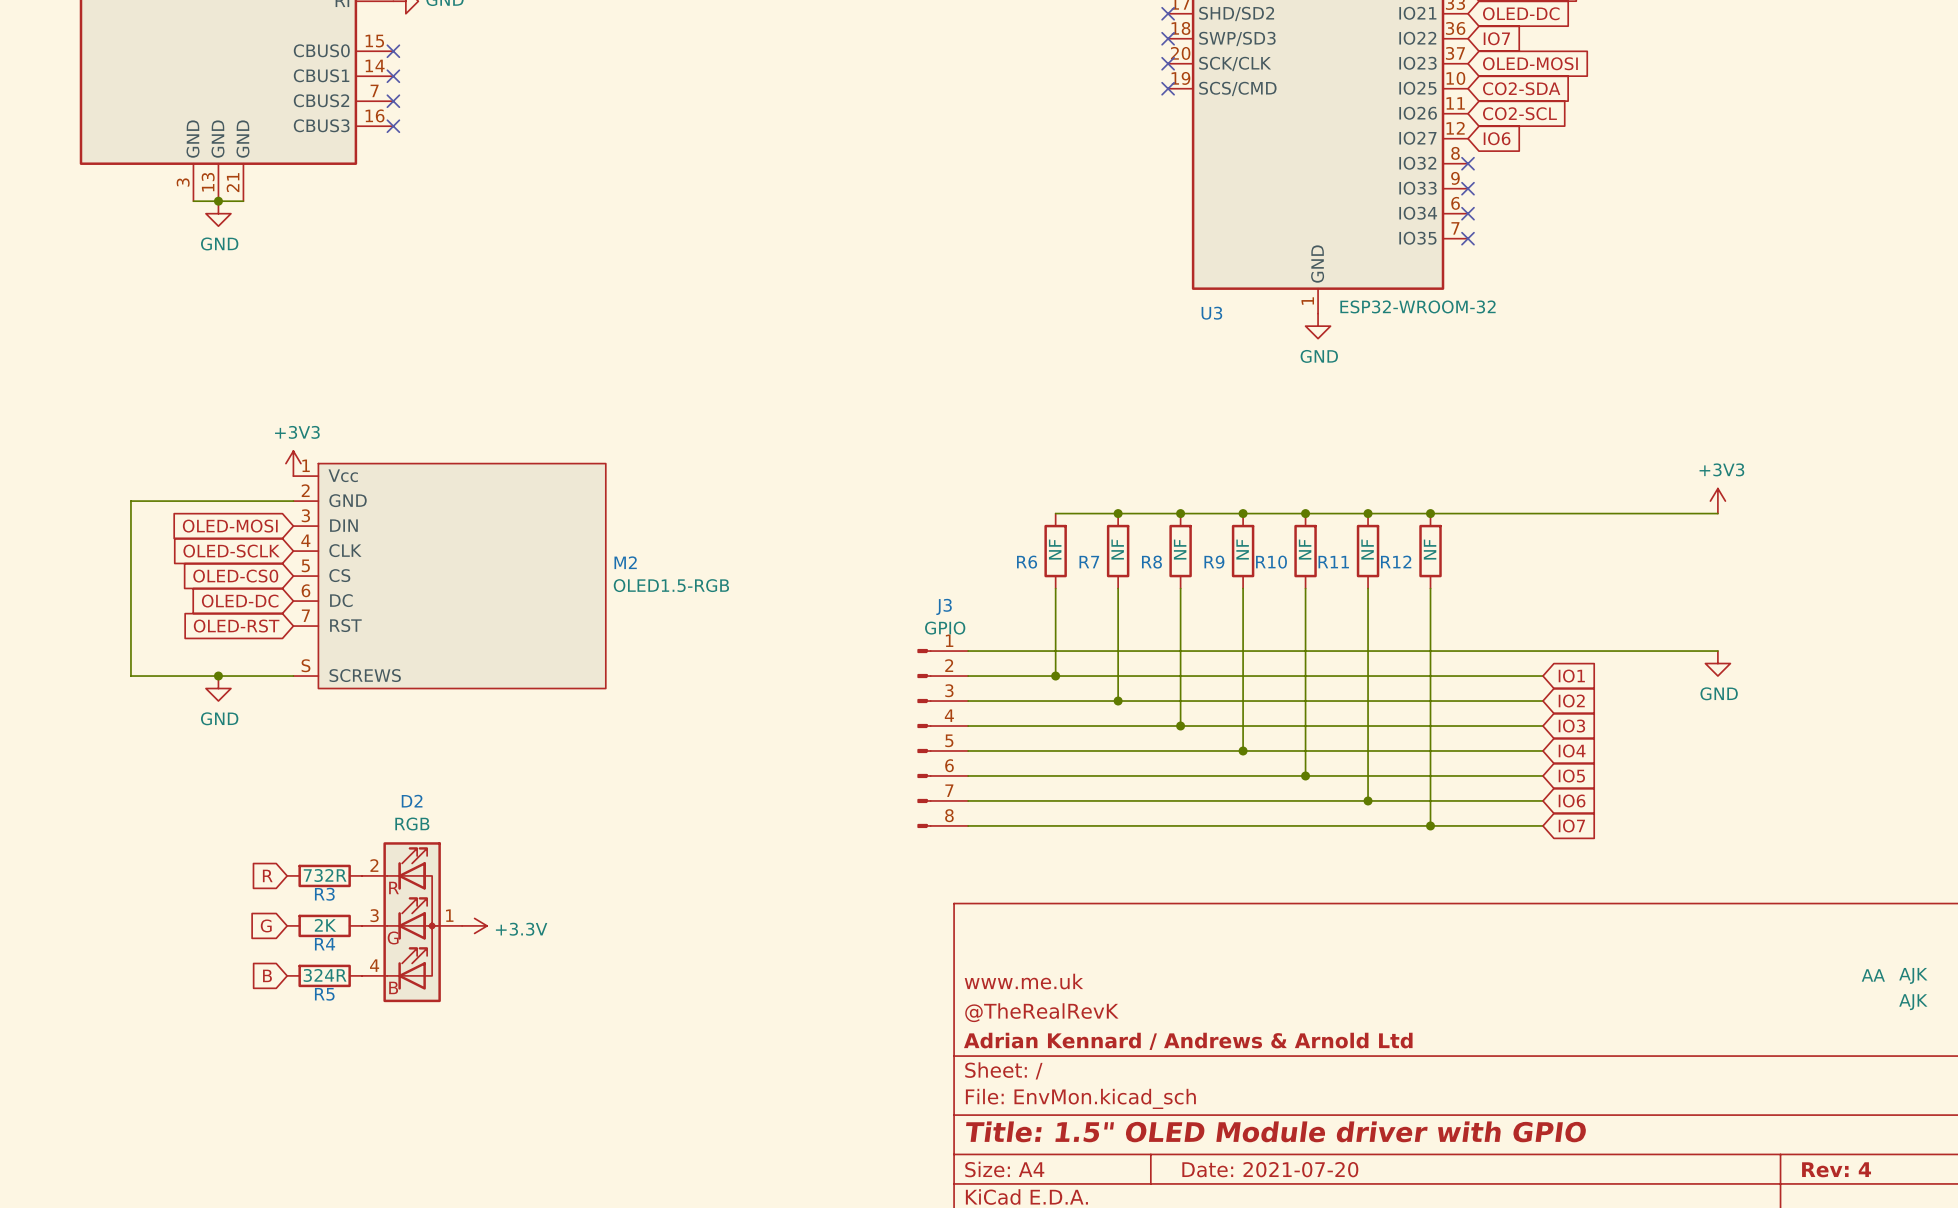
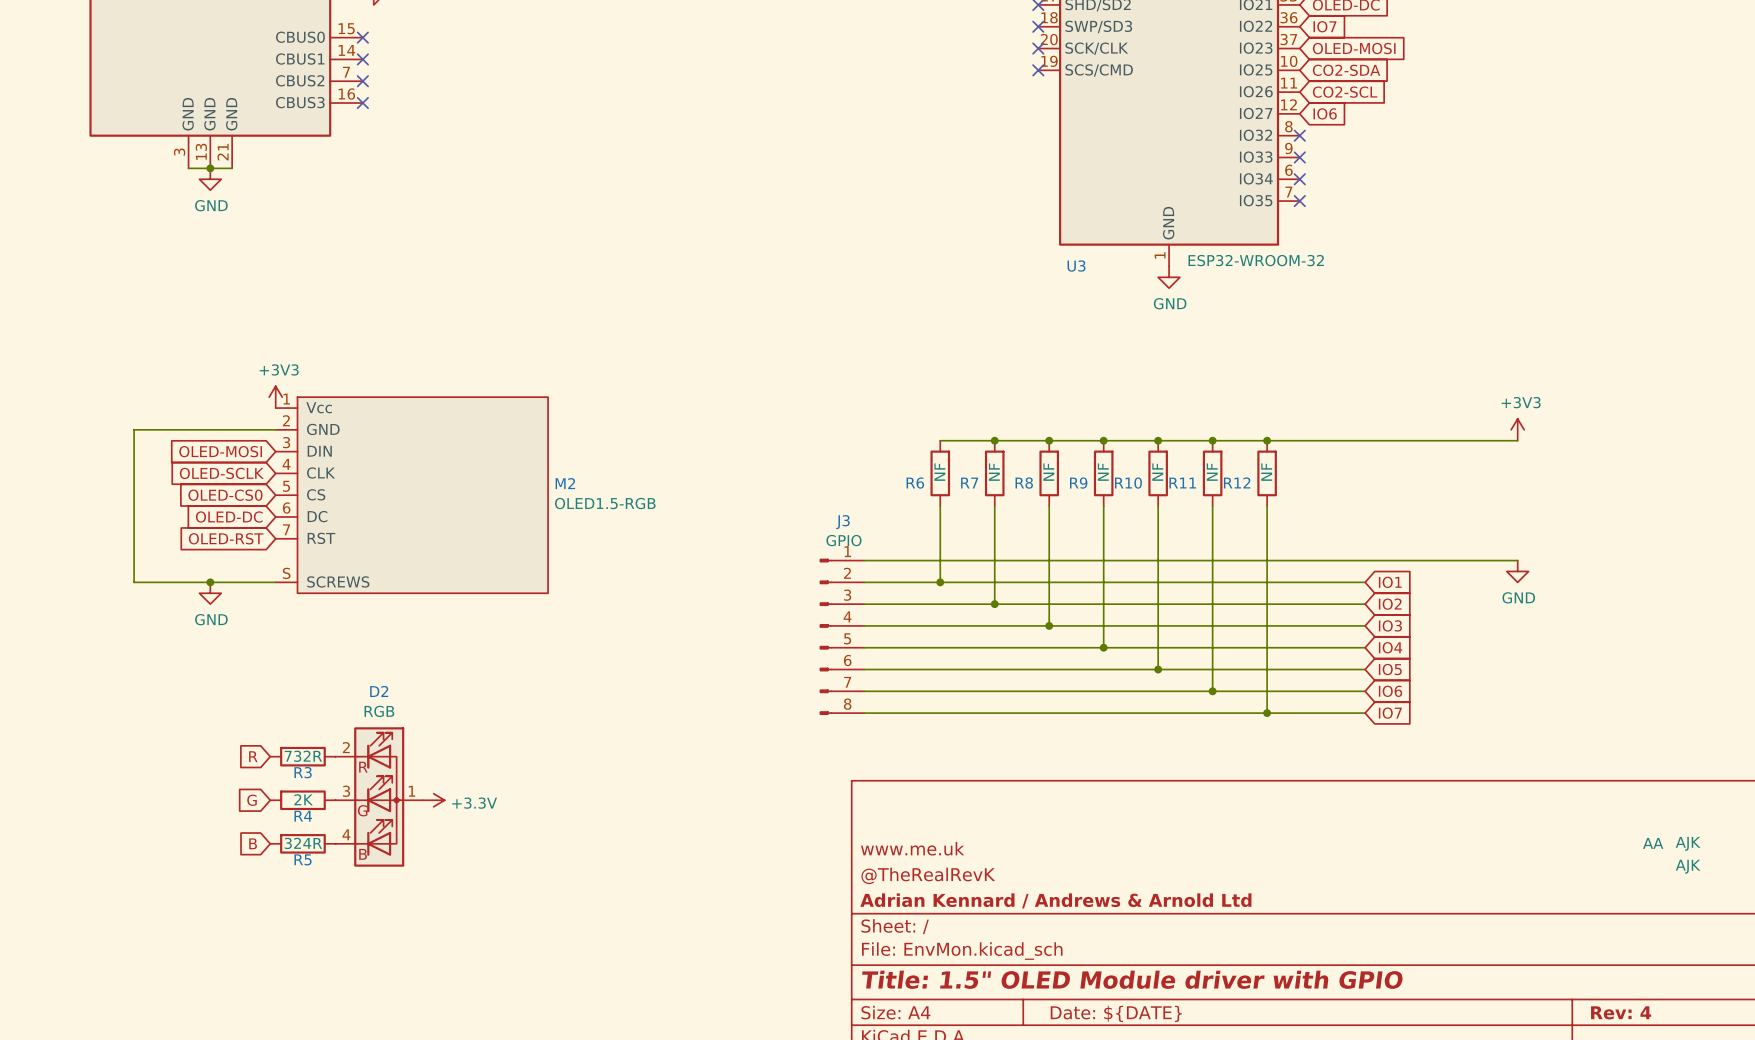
title block: Date: 2021-07-20 (1270, 1169) -> Date: ${DATE} (1116, 1013)

